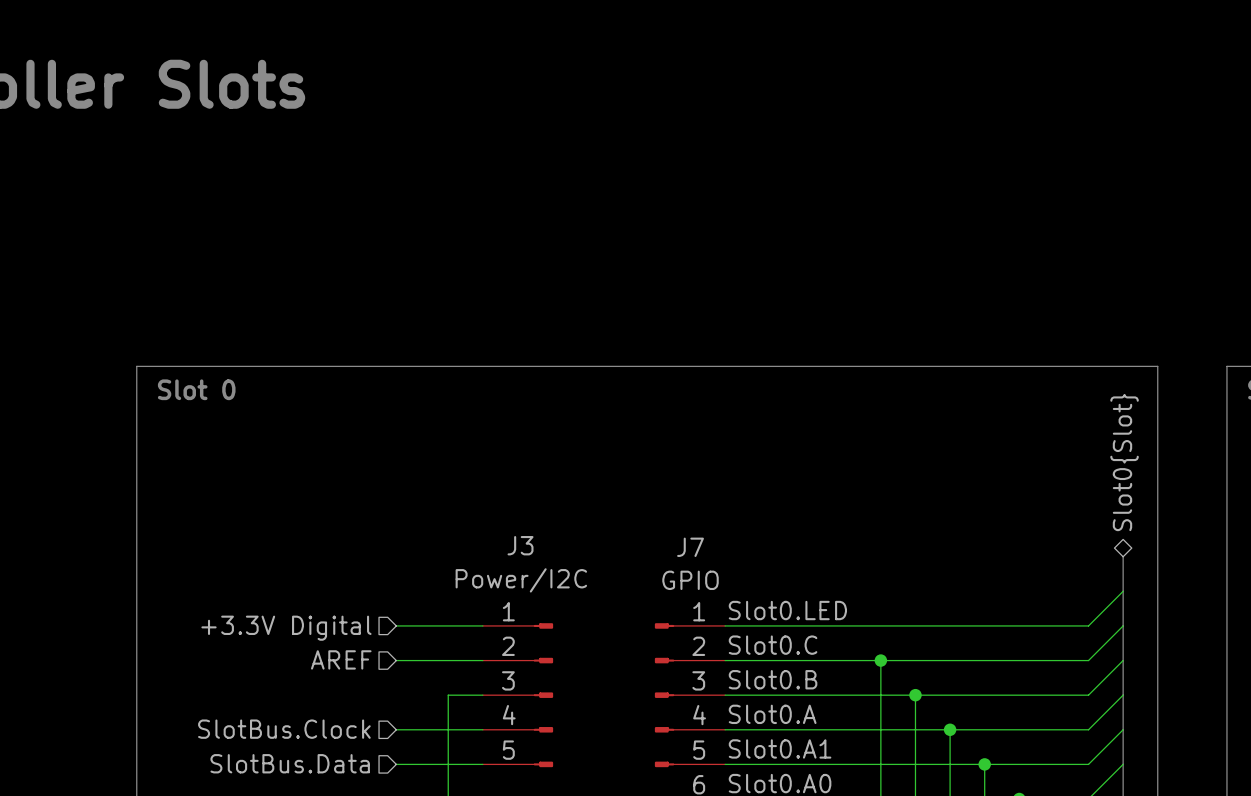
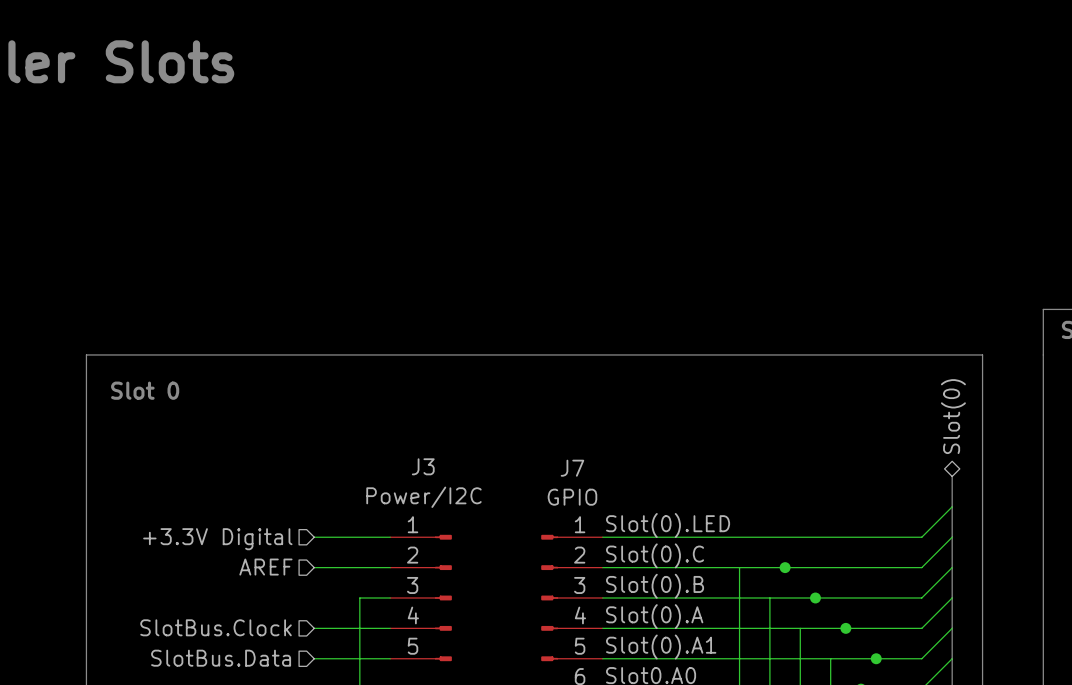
text position: Slot 0 (196, 389) -> Slot 0 (145, 390)
line: (136, 418) (136, 366) (1157, 366) (1157, 418) -> (86, 354) (982, 354)
hierarchical label: Slot0{Slot} (1124, 462) -> Slot(0) (953, 416)
label: Slot0.LED (787, 610) -> Slot(0).LED (668, 525)
label: Slot0.C (773, 645) -> Slot(0).C (655, 555)
junction: (880, 660) -> none
junction: none -> (785, 567)
label: Slot0.B (773, 679) -> Slot(0).B (655, 586)
junction: (915, 695) -> none
junction: none -> (815, 597)
label: Slot0.A (772, 714) -> Slot(0).A (654, 616)
junction: (950, 729) -> none
junction: none -> (845, 628)
label: Slot0.A1 (780, 748) -> Slot(0).A1 (661, 647)
junction: (984, 764) -> none
junction: none -> (876, 658)

